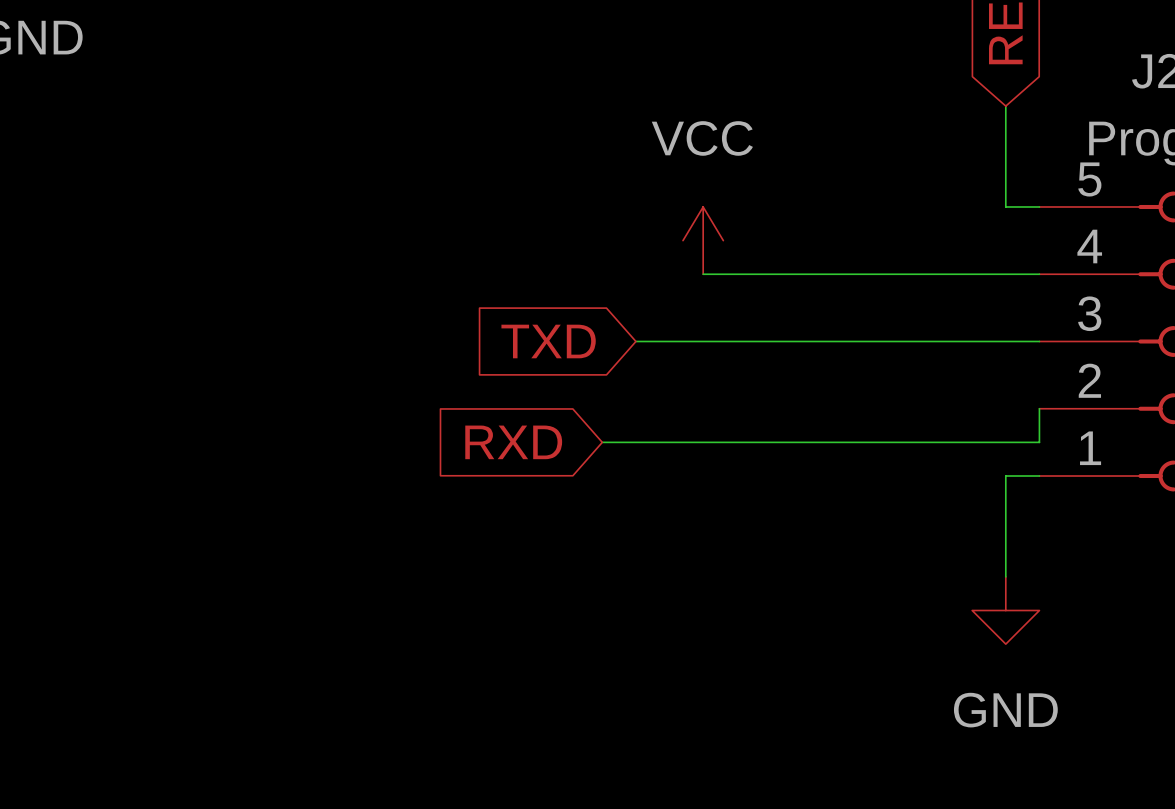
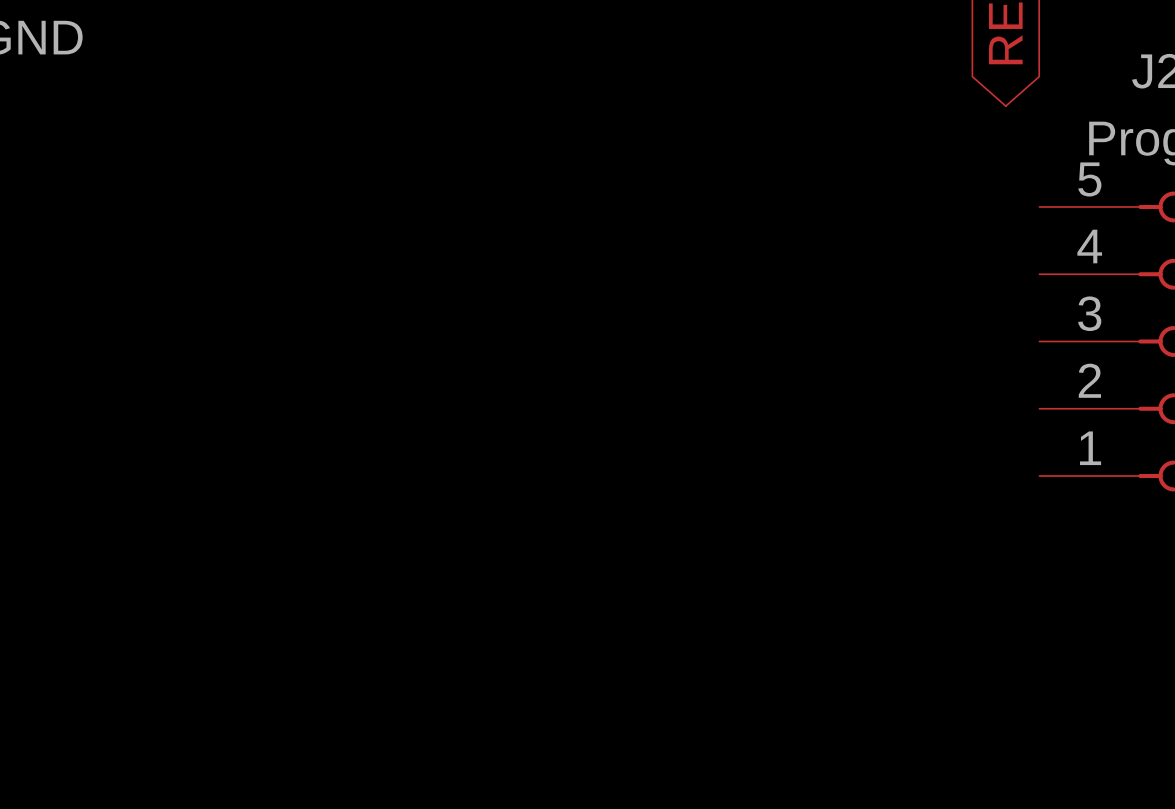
wire: (1005, 106) (1005, 206) (1039, 206) -> none
power symbol: VCC (703, 240) -> none
wire: (703, 274) (1039, 274) -> none
global label: TXD (548, 341) -> none
wire: (635, 341) (1039, 341) -> none
wire: (1039, 408) (1039, 442) (602, 442) -> none
global label: RXD (513, 442) -> none
wire: (1039, 476) (1005, 476) (1005, 576) -> none
power symbol: GND (1005, 610) -> none

